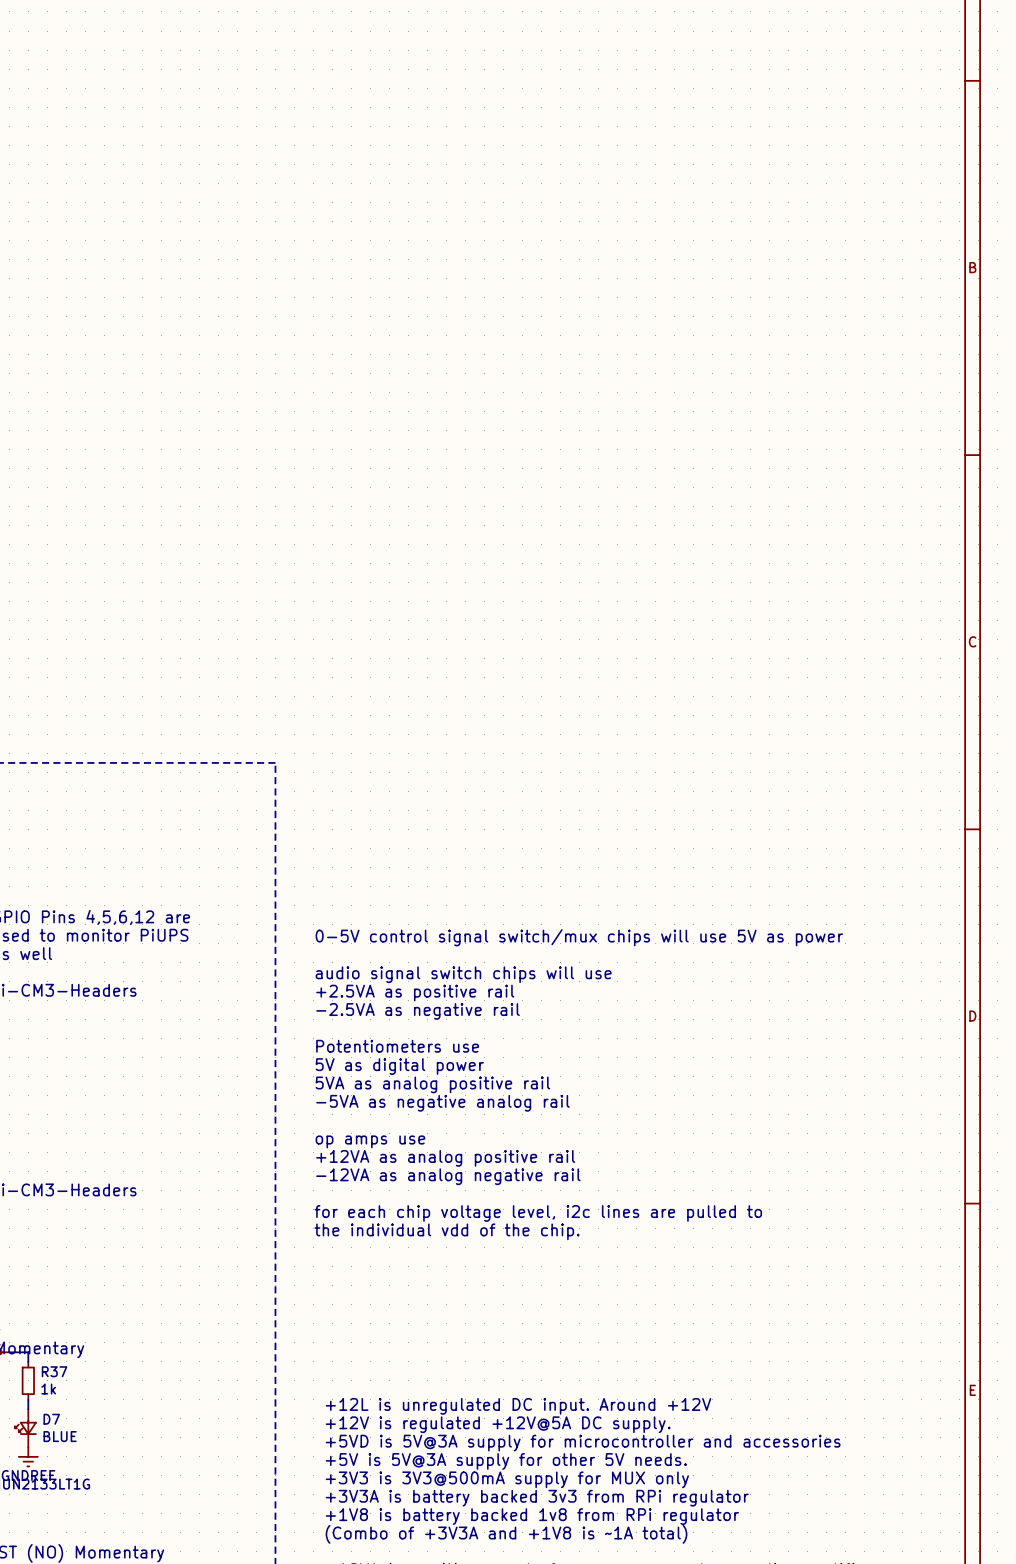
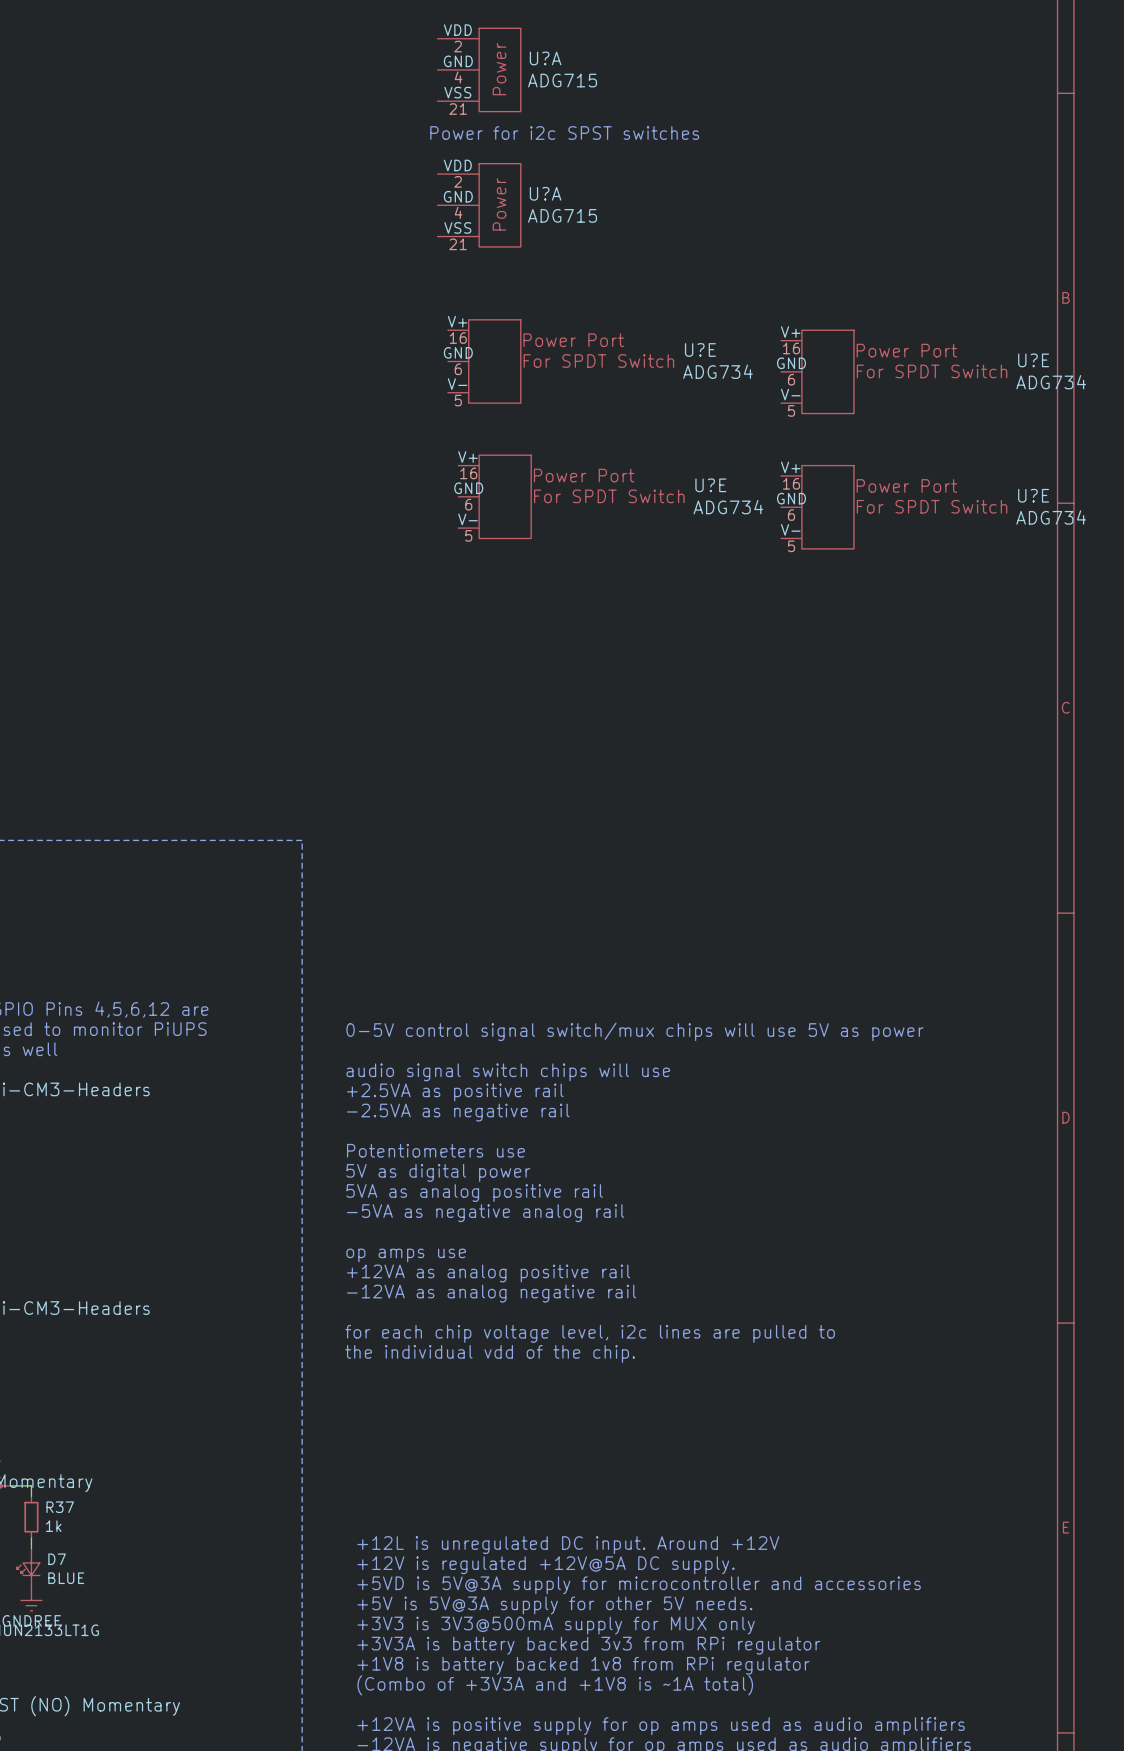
U?A: none -> ADG715 (479, 69)
text: none -> Power for i2c SPST switches (564, 133)
U?A: none -> ADG715 (479, 205)
U?E: none -> ADG734 (484, 361)
U?E: none -> ADG734 (817, 371)
U?E: none -> ADG734 (494, 496)
U?E: none -> ADG734 (817, 507)

